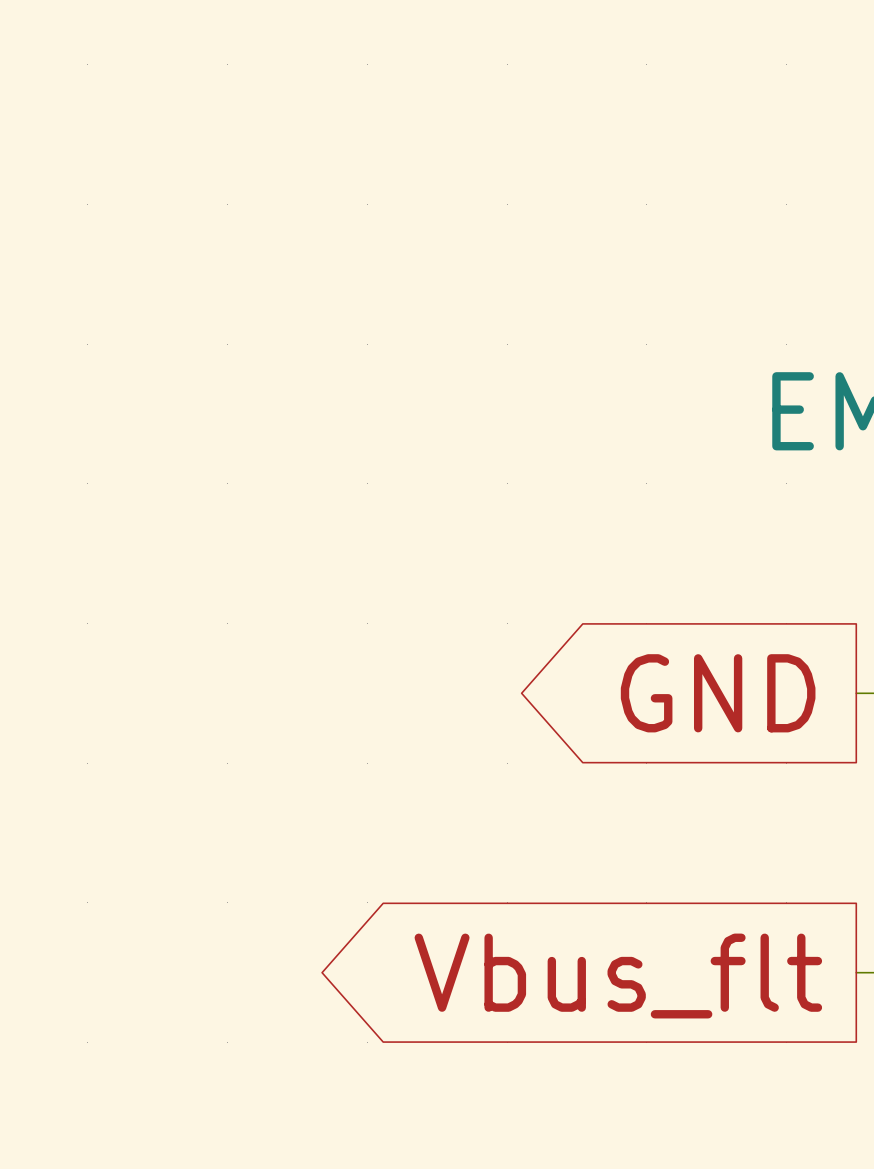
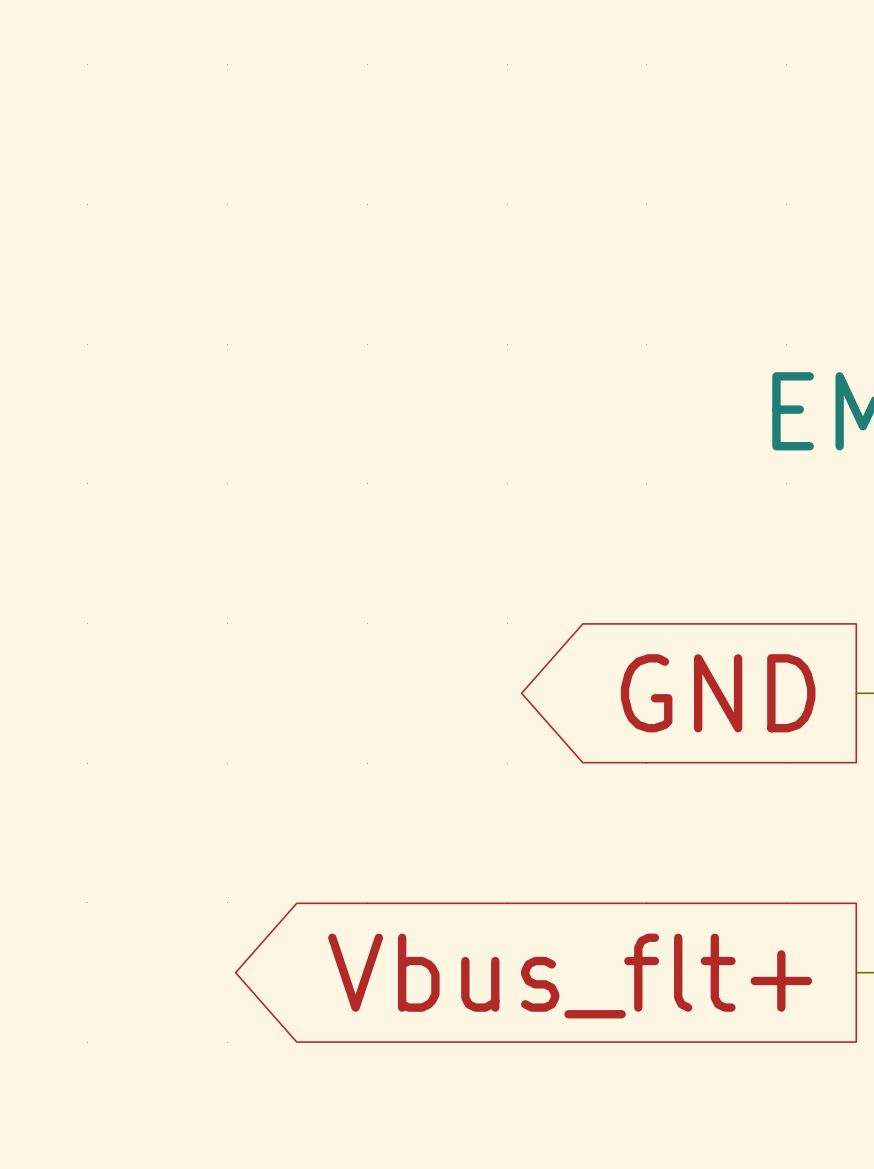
global label: Vbus_flt (618, 976) -> Vbus_flt+ (570, 976)

